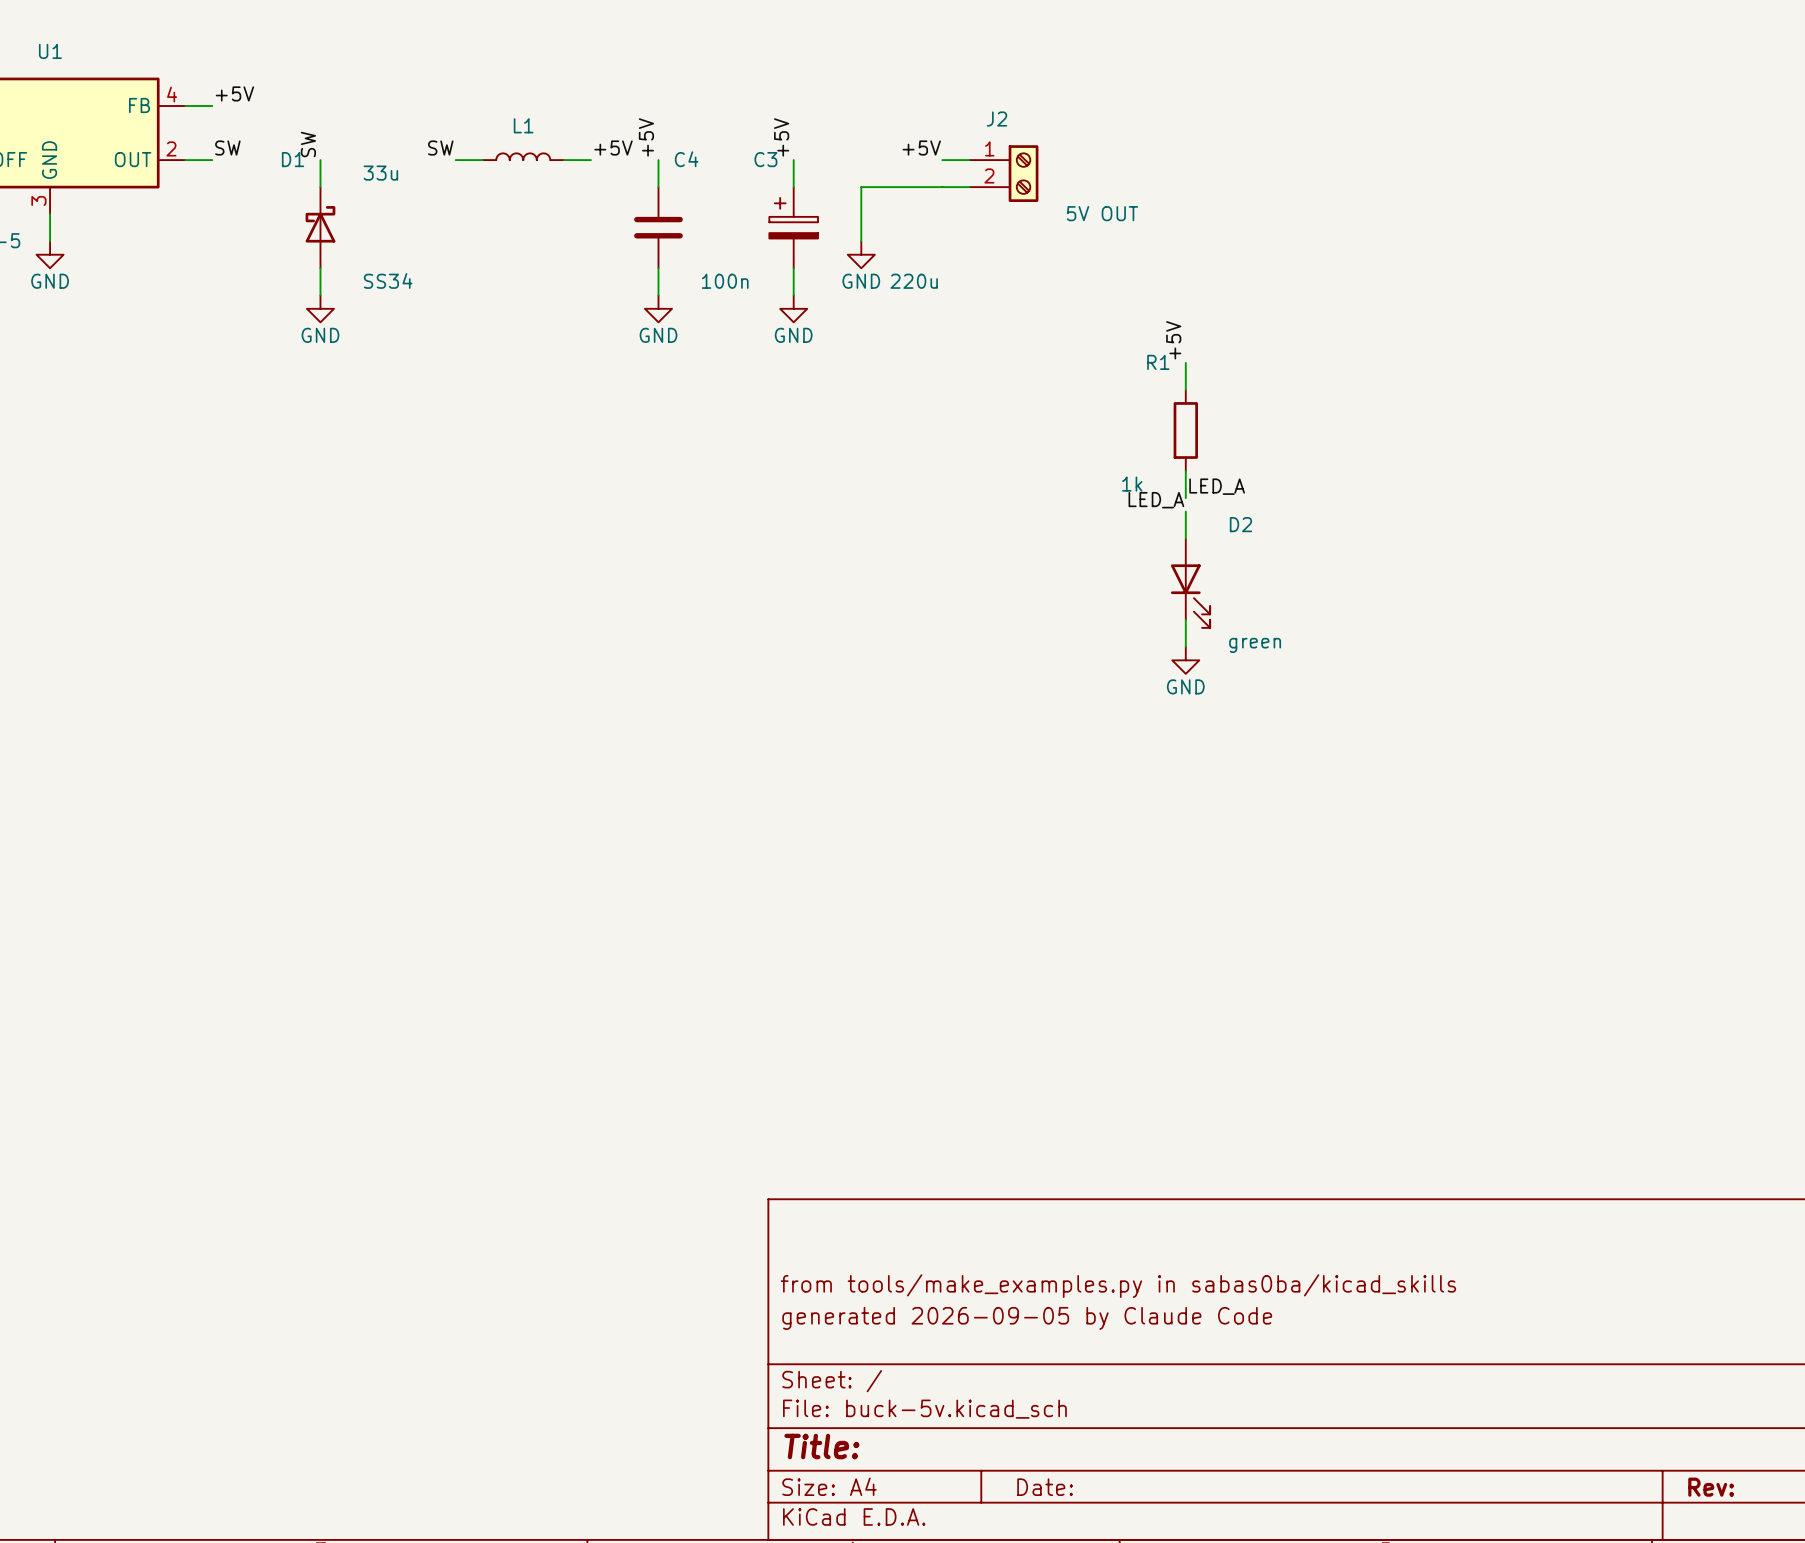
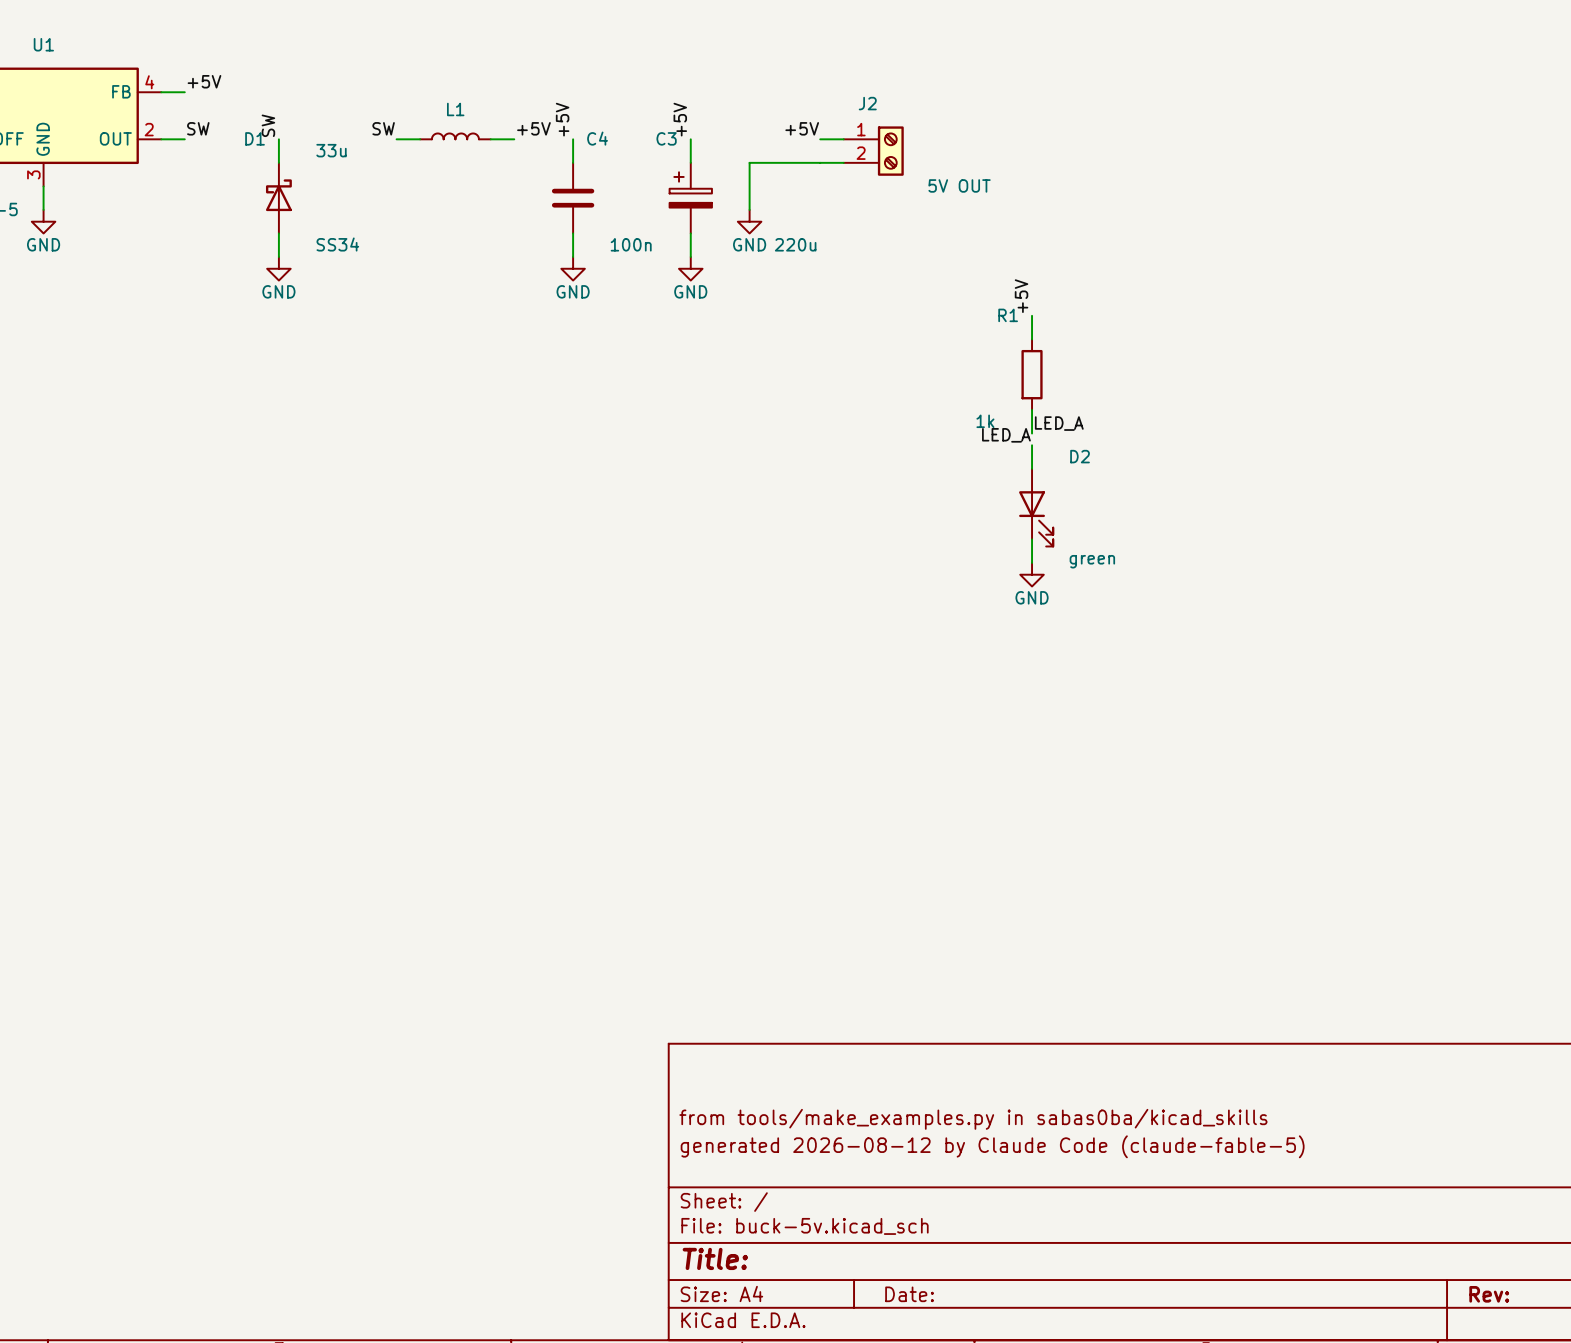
title block: generated 2026-09-05 by Claude Code (1027, 1318) -> generated 2026-08-12 by Claude Code (claude-fable-5) (992, 1146)

